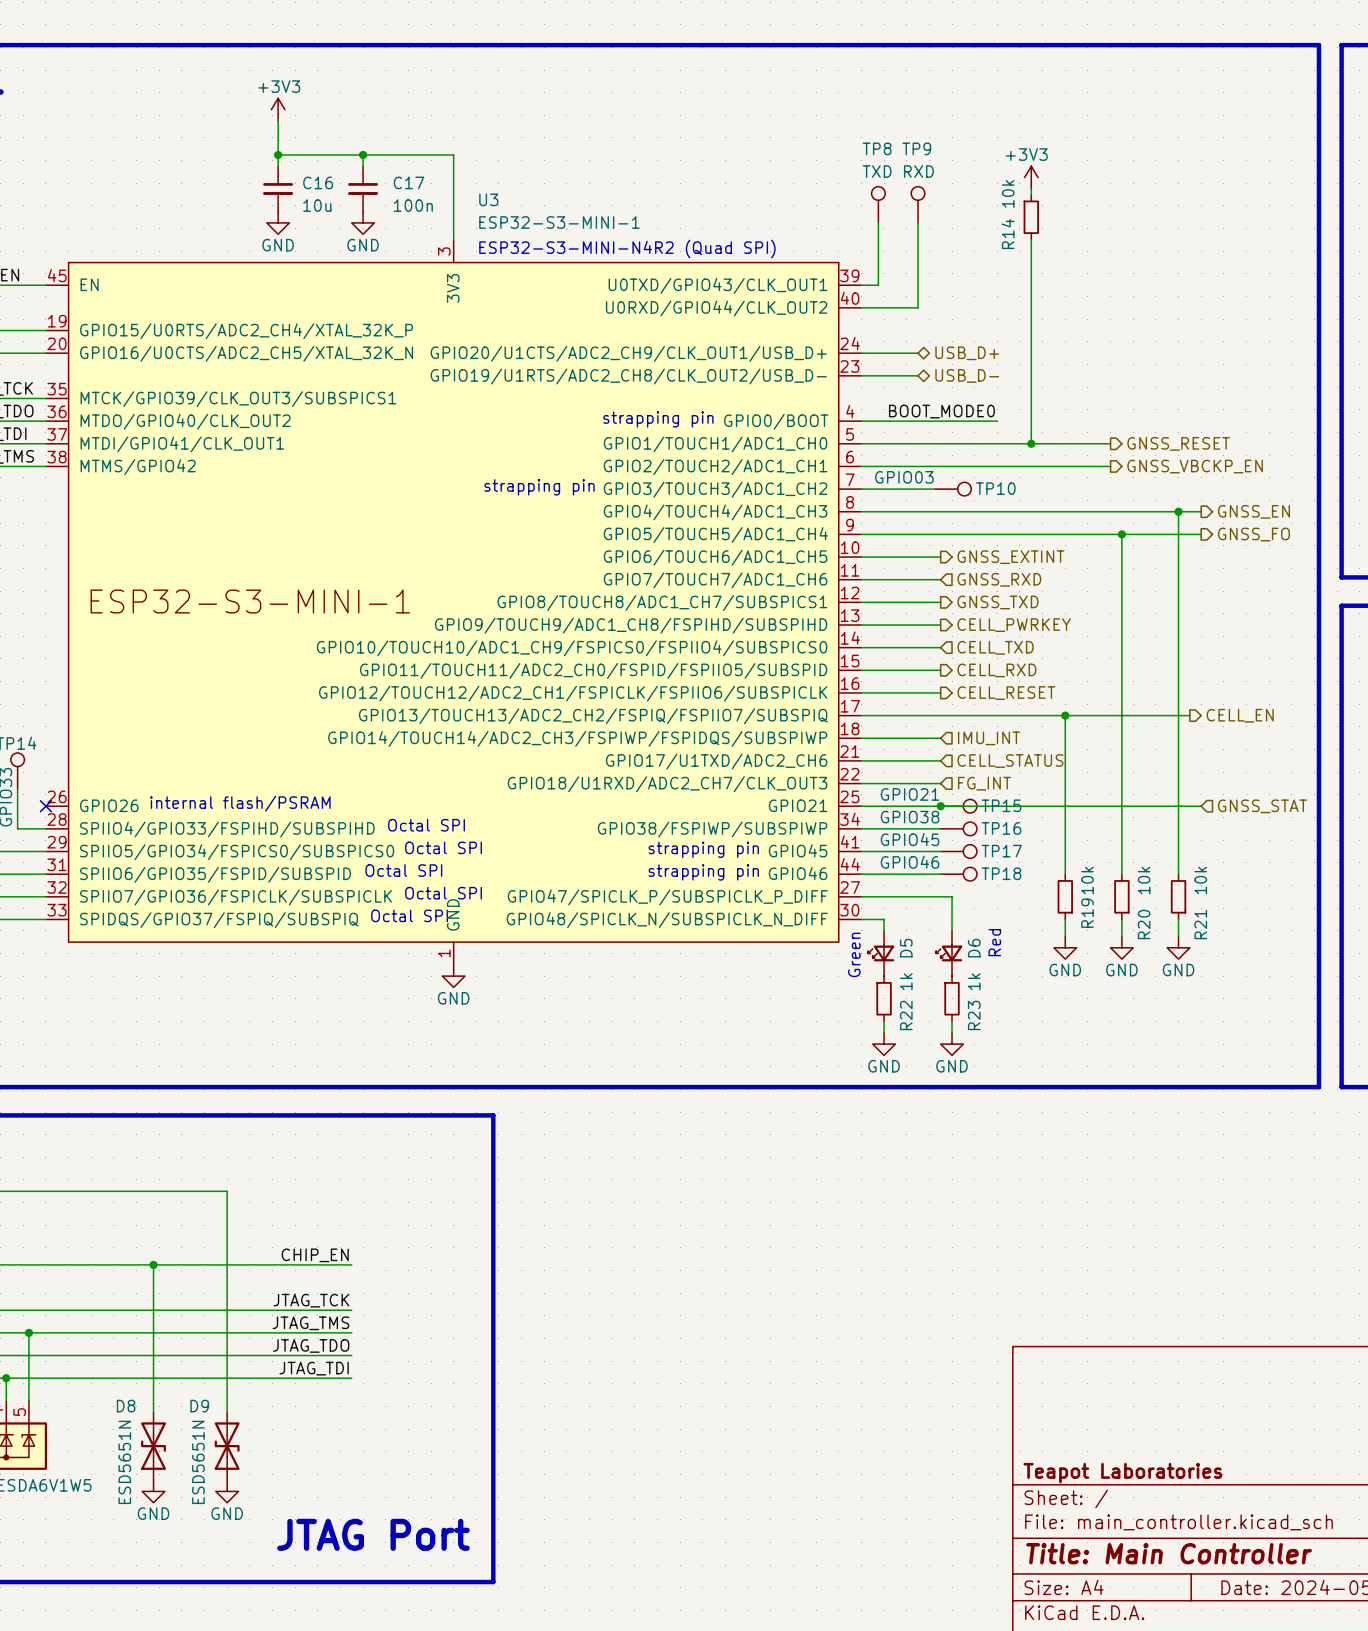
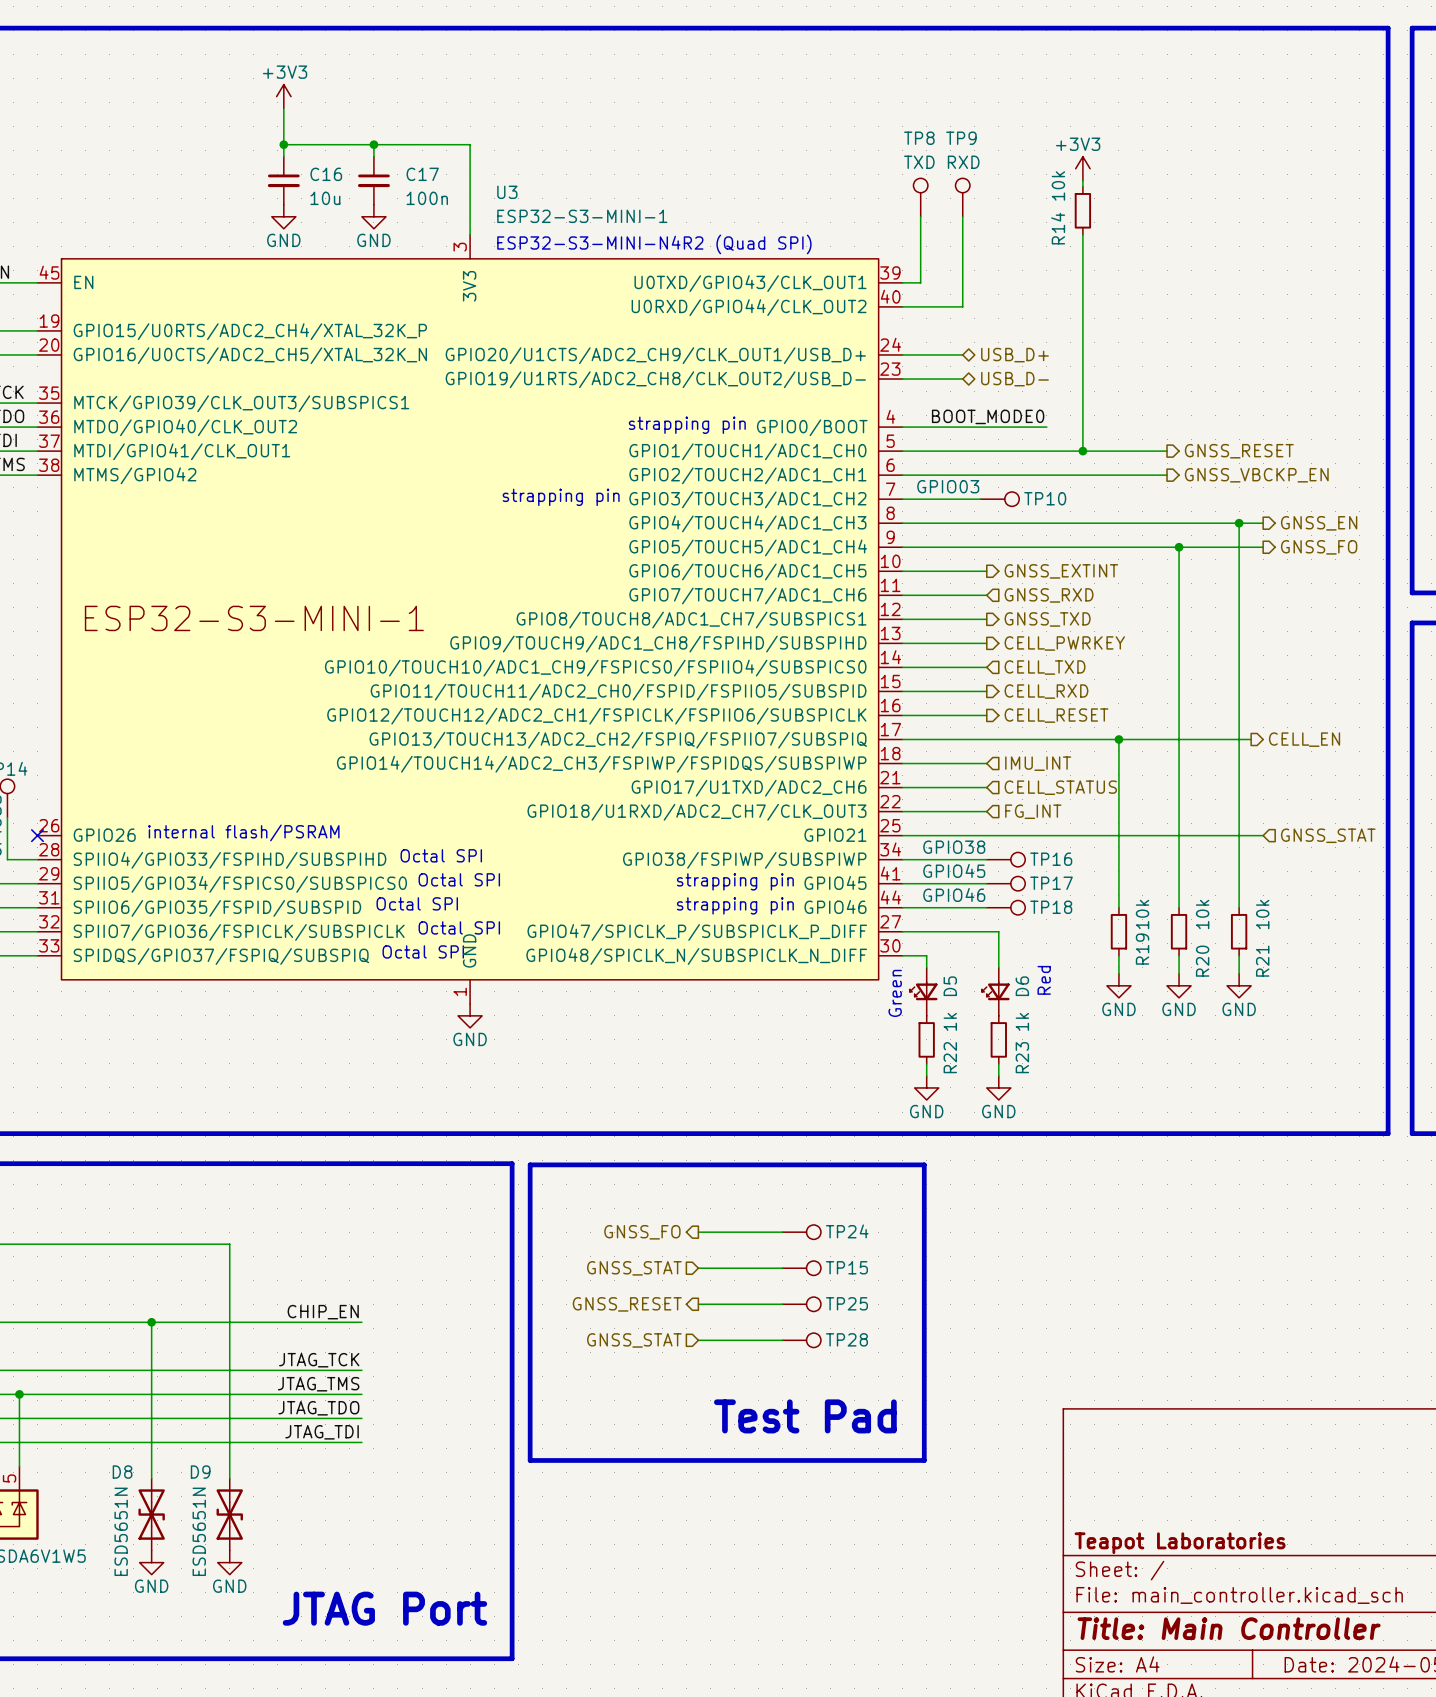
TP15 value: GPIO21 (910, 794) -> none
junction: (940, 806) -> none
TP15 position: (958, 806) -> (801, 1268)
line: none -> (530, 1164) (924, 1164) (924, 1460) (530, 1460) (530, 1164)
wire: none -> (698, 1232) (782, 1232)
TP24: none -> (801, 1232)
hierarchical label: none -> GNSS_FO (642, 1232)
wire: none -> (698, 1268) (782, 1268)
hierarchical label: none -> GNSS_STAT (634, 1268)
wire: none -> (698, 1304) (782, 1304)
TP25: none -> (801, 1304)
hierarchical label: none -> GNSS_RESET (627, 1304)
wire: none -> (698, 1340) (782, 1340)
TP28: none -> (801, 1340)
hierarchical label: none -> GNSS_STAT (634, 1340)
text: none -> Test Pad (805, 1416)

